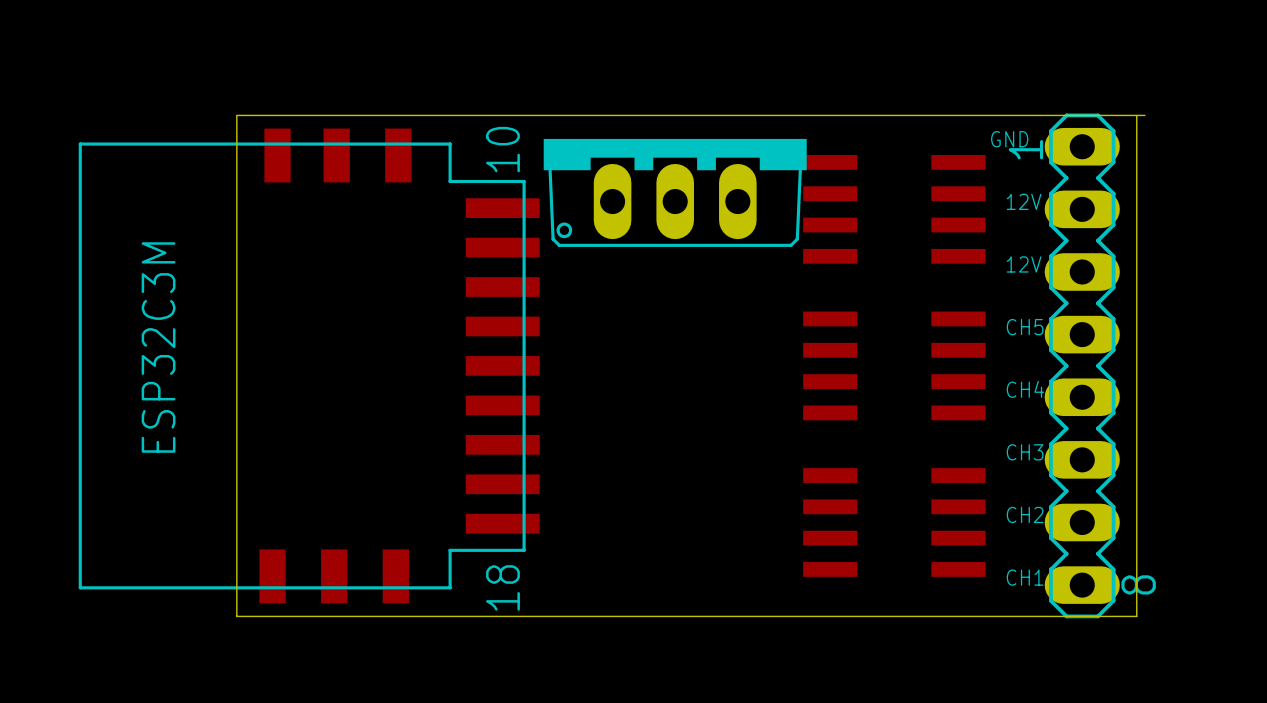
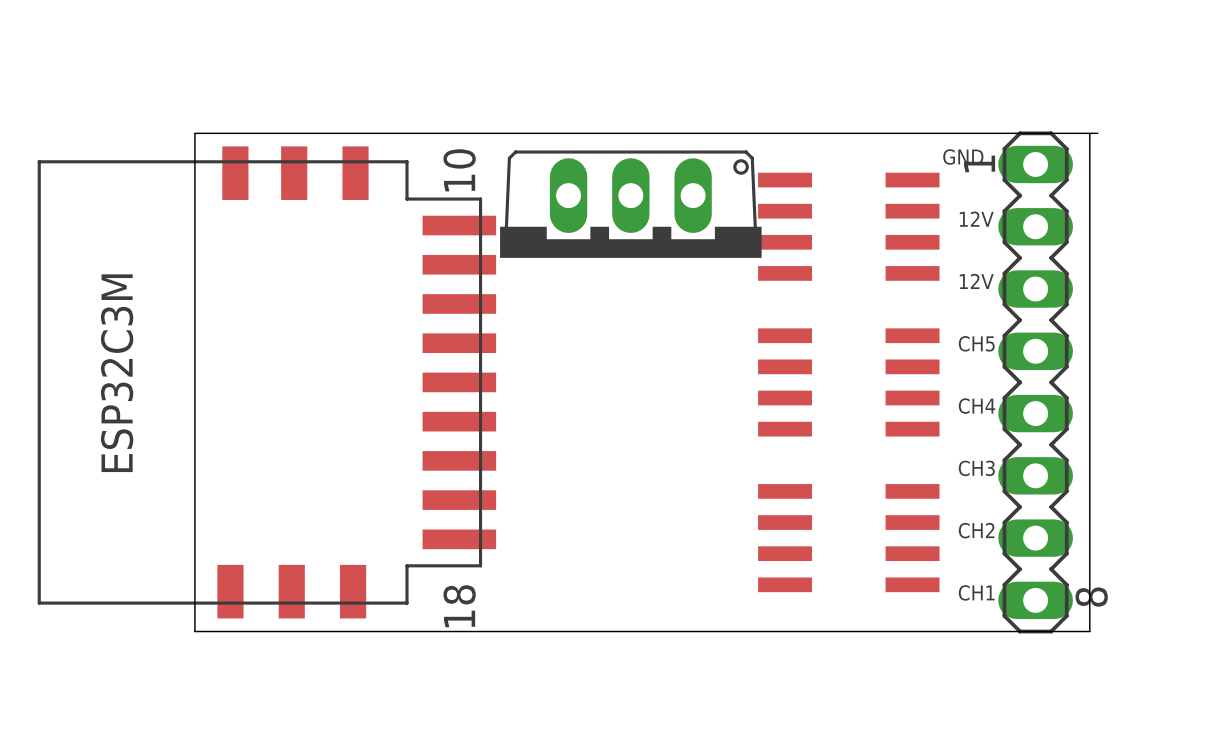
part rotation: 0° (675, 192) -> 180° (630, 204)

